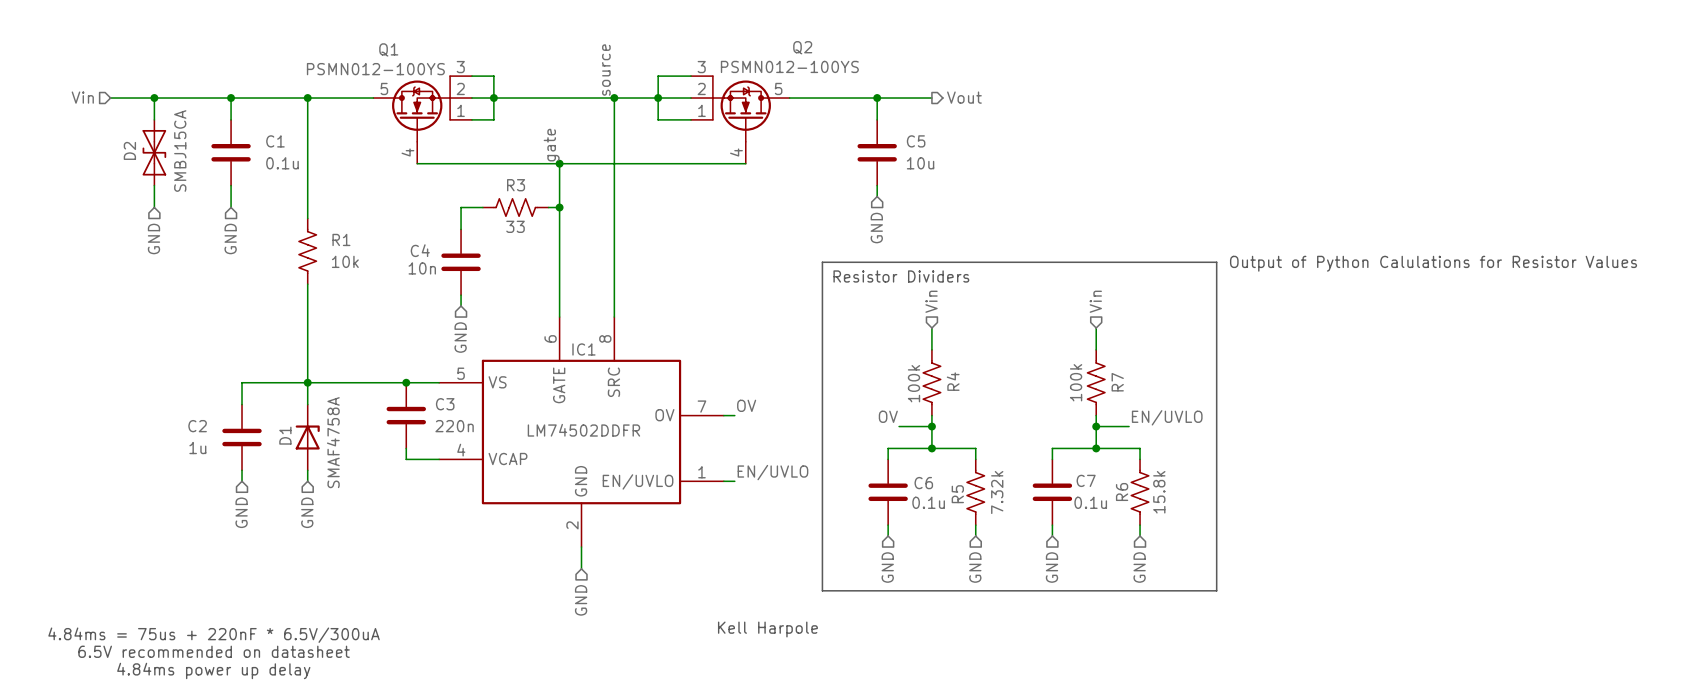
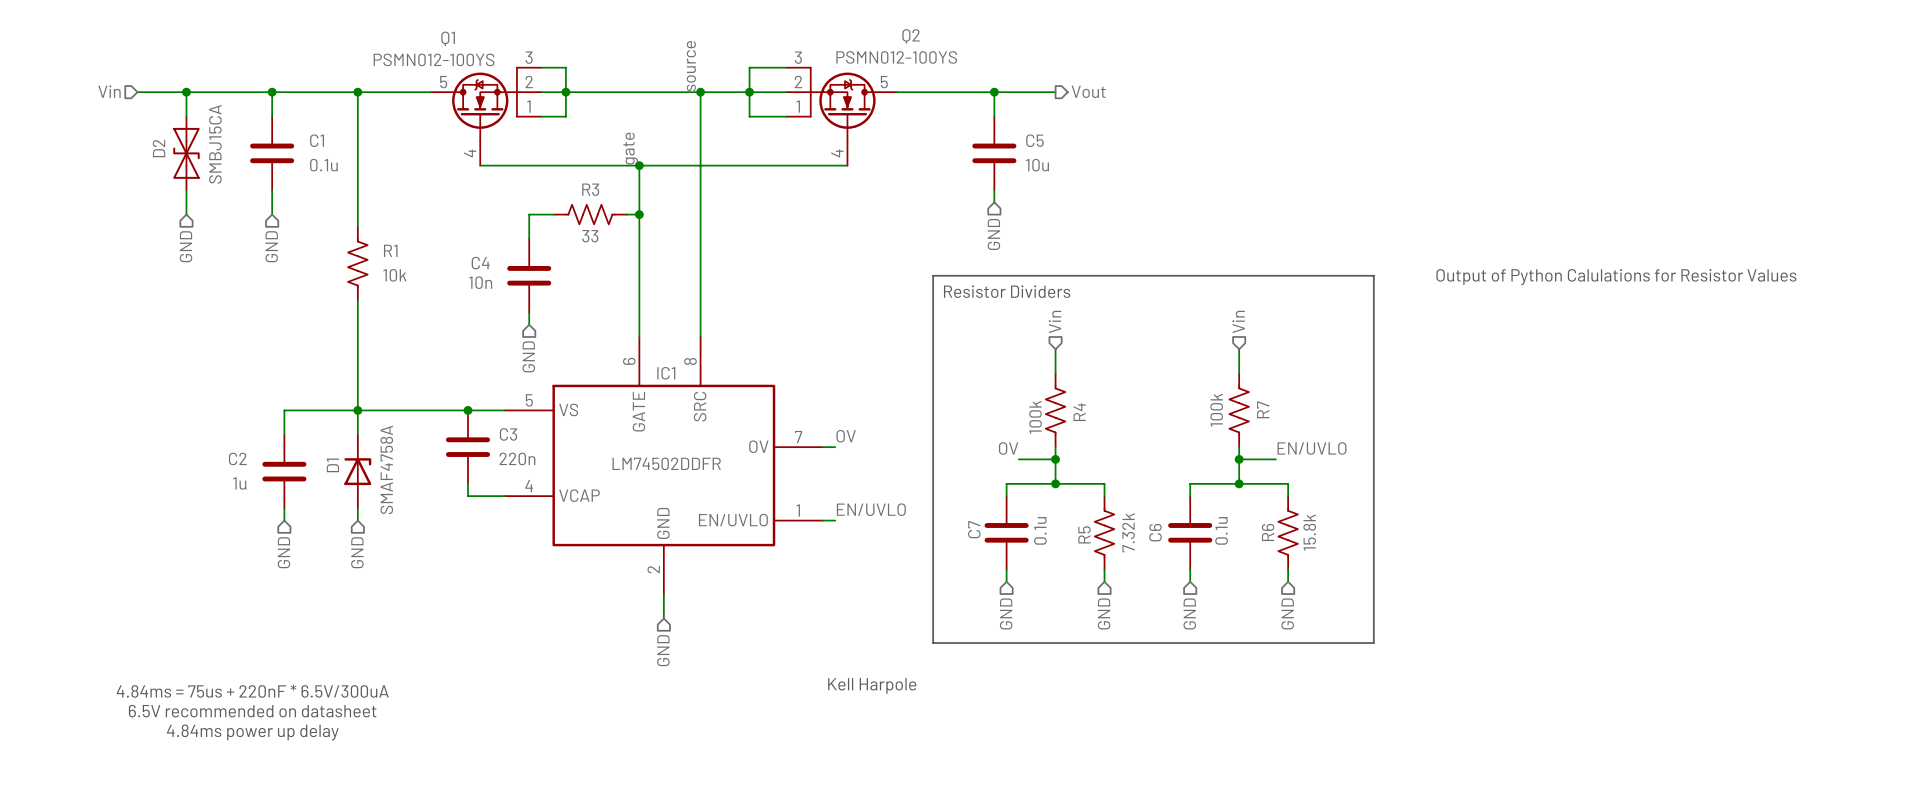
C7 name: C7 (1086, 480) -> C6 (1155, 532)
C6 name: C6 (923, 483) -> C7 (974, 529)
C6 value rotation: 0° (928, 502) -> 90° counterclockwise (1040, 530)
C7 value rotation: 0° (1090, 502) -> 90° counterclockwise (1221, 530)

